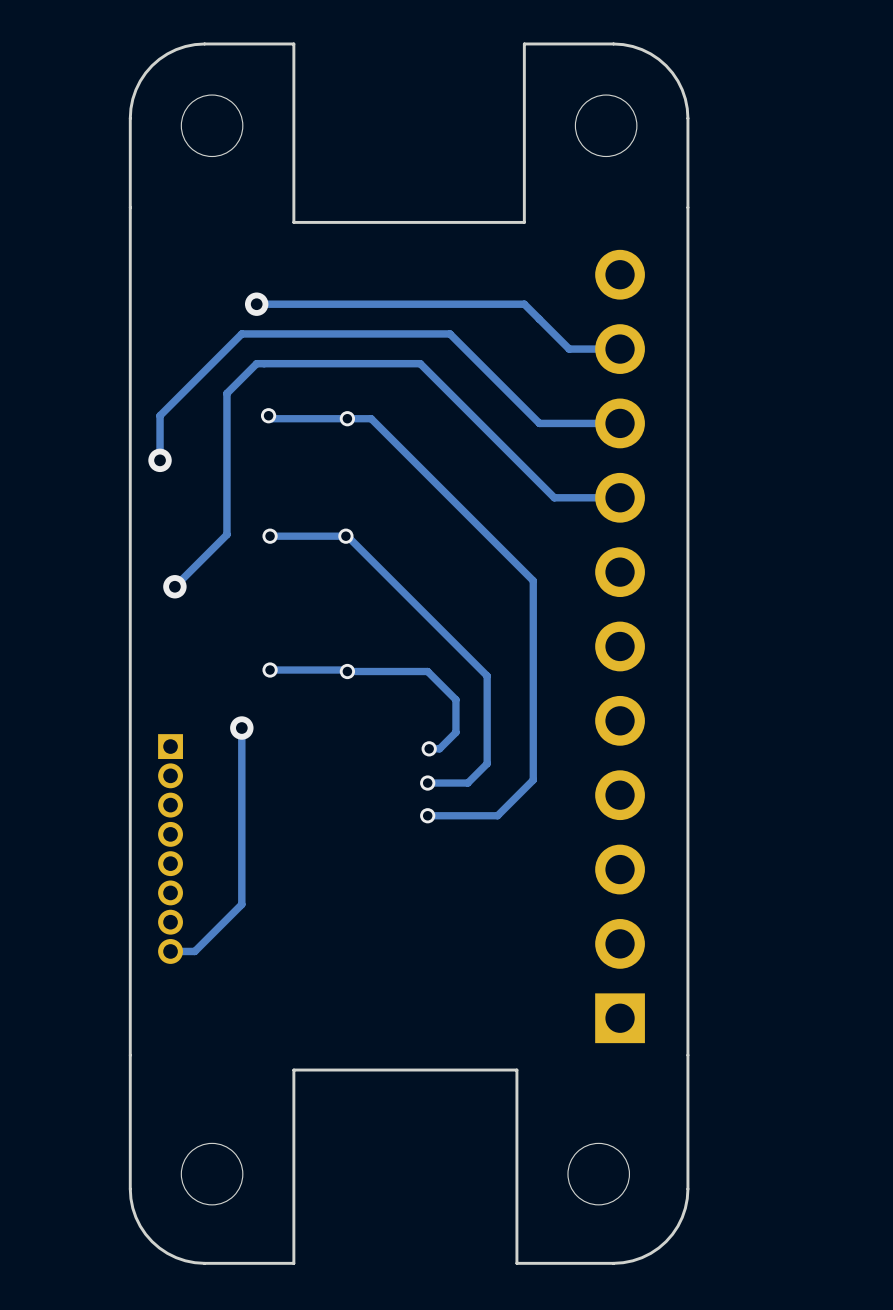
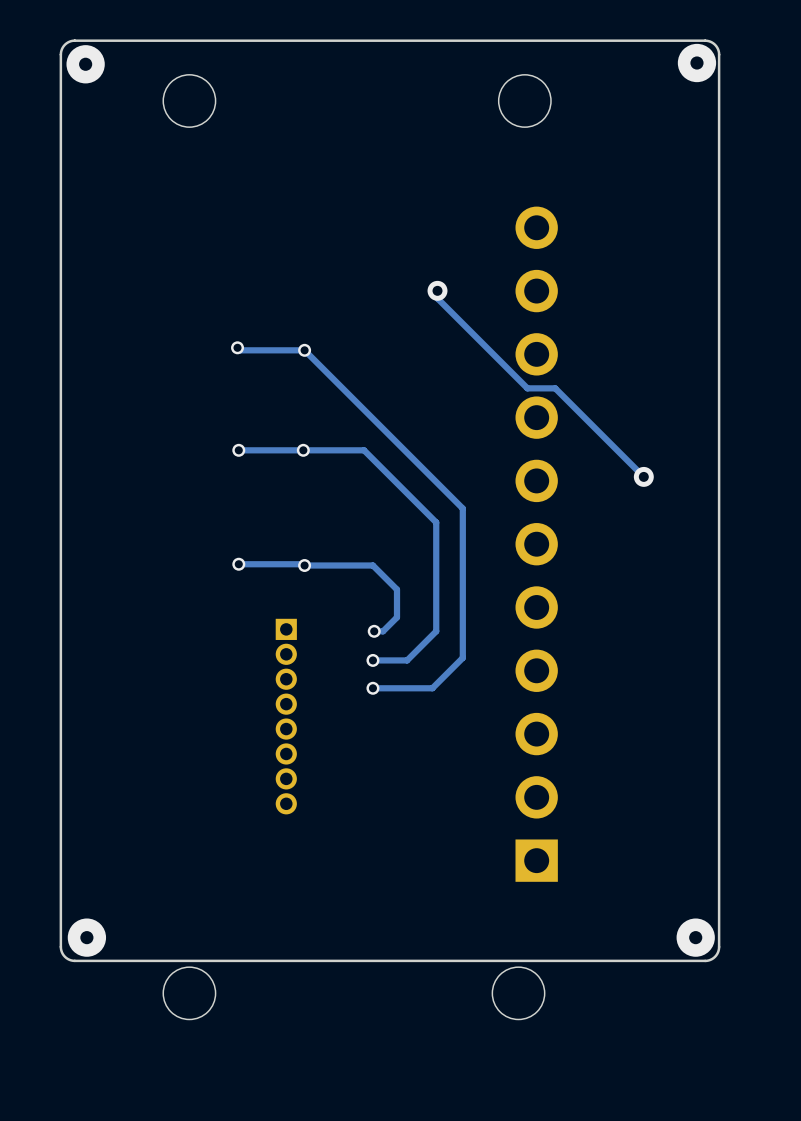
board edge: (613, 43) (524, 43) (524, 222) (293, 222) (293, 43) (204, 43) (185, 46) (167, 53) (152, 65) (135, 89) (130, 118) (130, 1189) (132, 1208) (145, 1234) (159, 1247) (176, 1257) (204, 1263) (293, 1263) (293, 1070) (516, 1070) (516, 1263) (613, 1263) (632, 1260) (658, 1247) (672, 1234) (682, 1217) (687, 1189) (687, 118) (682, 89) (666, 65) (642, 49) (613, 43) -> (705, 960) (74, 960) (63, 955) (60, 946) (60, 54) (66, 43) (74, 40) (705, 40) (716, 46) (719, 54) (719, 946) (715, 956) (705, 960)
via: none -> (696, 63)
via: none -> (85, 64)
track: (256, 304) (524, 304) (569, 349) (620, 349) -> none
via: (256, 304) -> none
track: none -> (437, 290) (437, 298) (527, 388) (555, 388) (643, 476)
via: none -> (437, 290)
track: (347, 418) (371, 418) (533, 580) (533, 604) -> (304, 350) (462, 508)
track: (620, 423) (539, 423) (450, 333) (241, 333) (160, 415) (160, 460) -> none
via: (160, 460) -> none
track: (620, 497) (554, 497) (420, 363) (256, 363) (226, 393) (226, 534) (174, 586) -> none
track: (347, 536) (487, 675) (487, 763) -> (304, 450) (364, 450) (436, 522) (436, 631) (423, 643)
via: none -> (643, 476)
via: (174, 586) -> none
track: (241, 728) (241, 904) (194, 951) (170, 951) -> none
via: (241, 728) -> none
part position: (170, 849) -> (286, 716)
via: none -> (86, 937)
via: none -> (695, 937)

